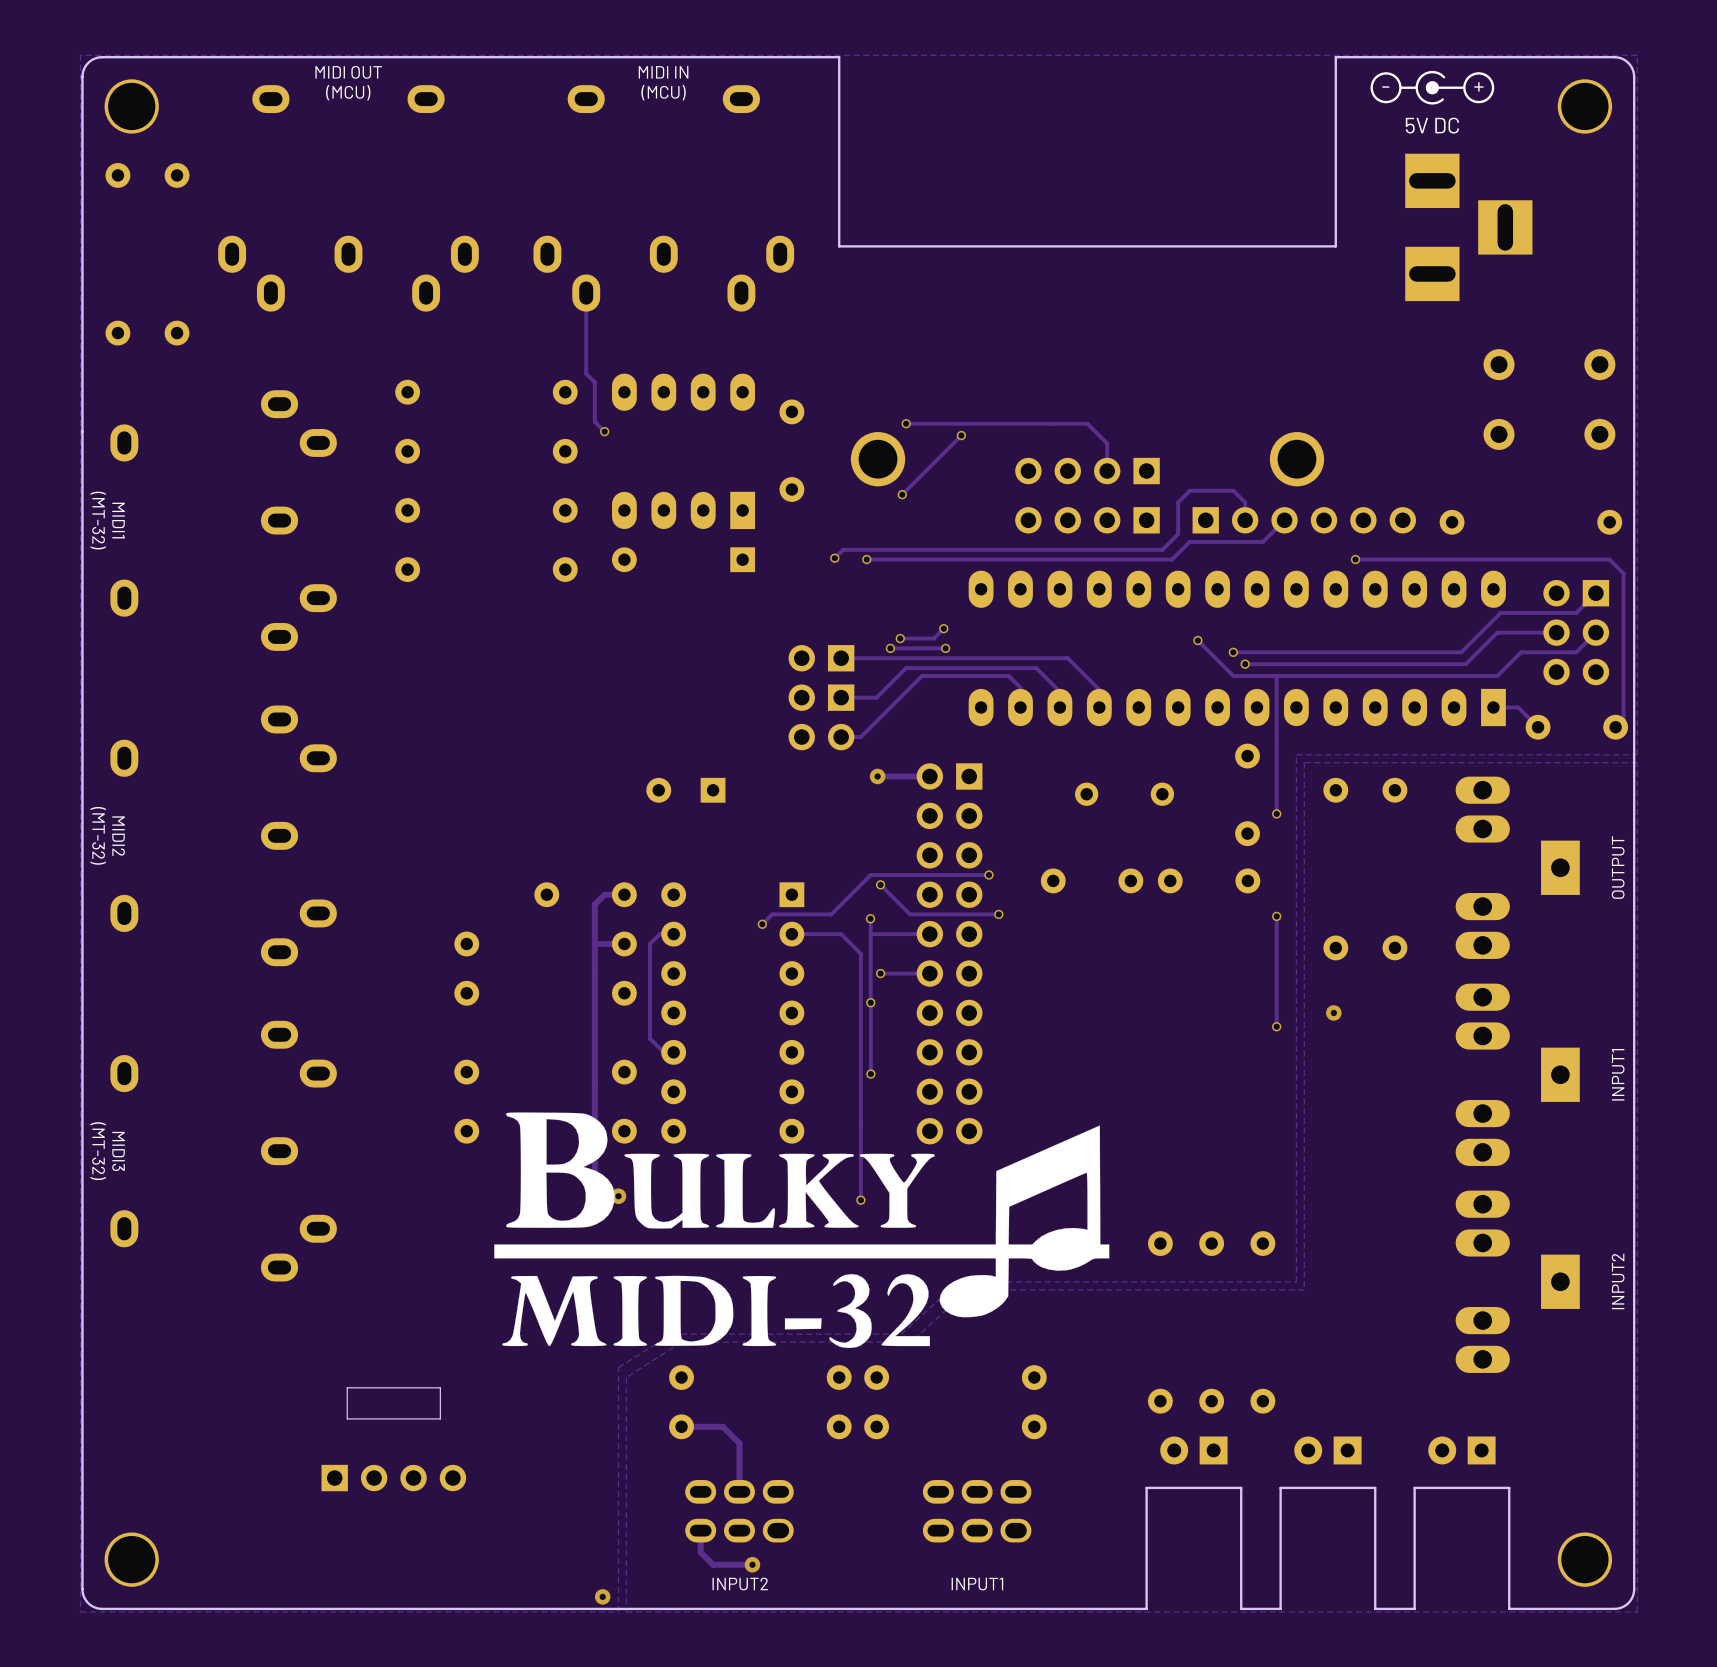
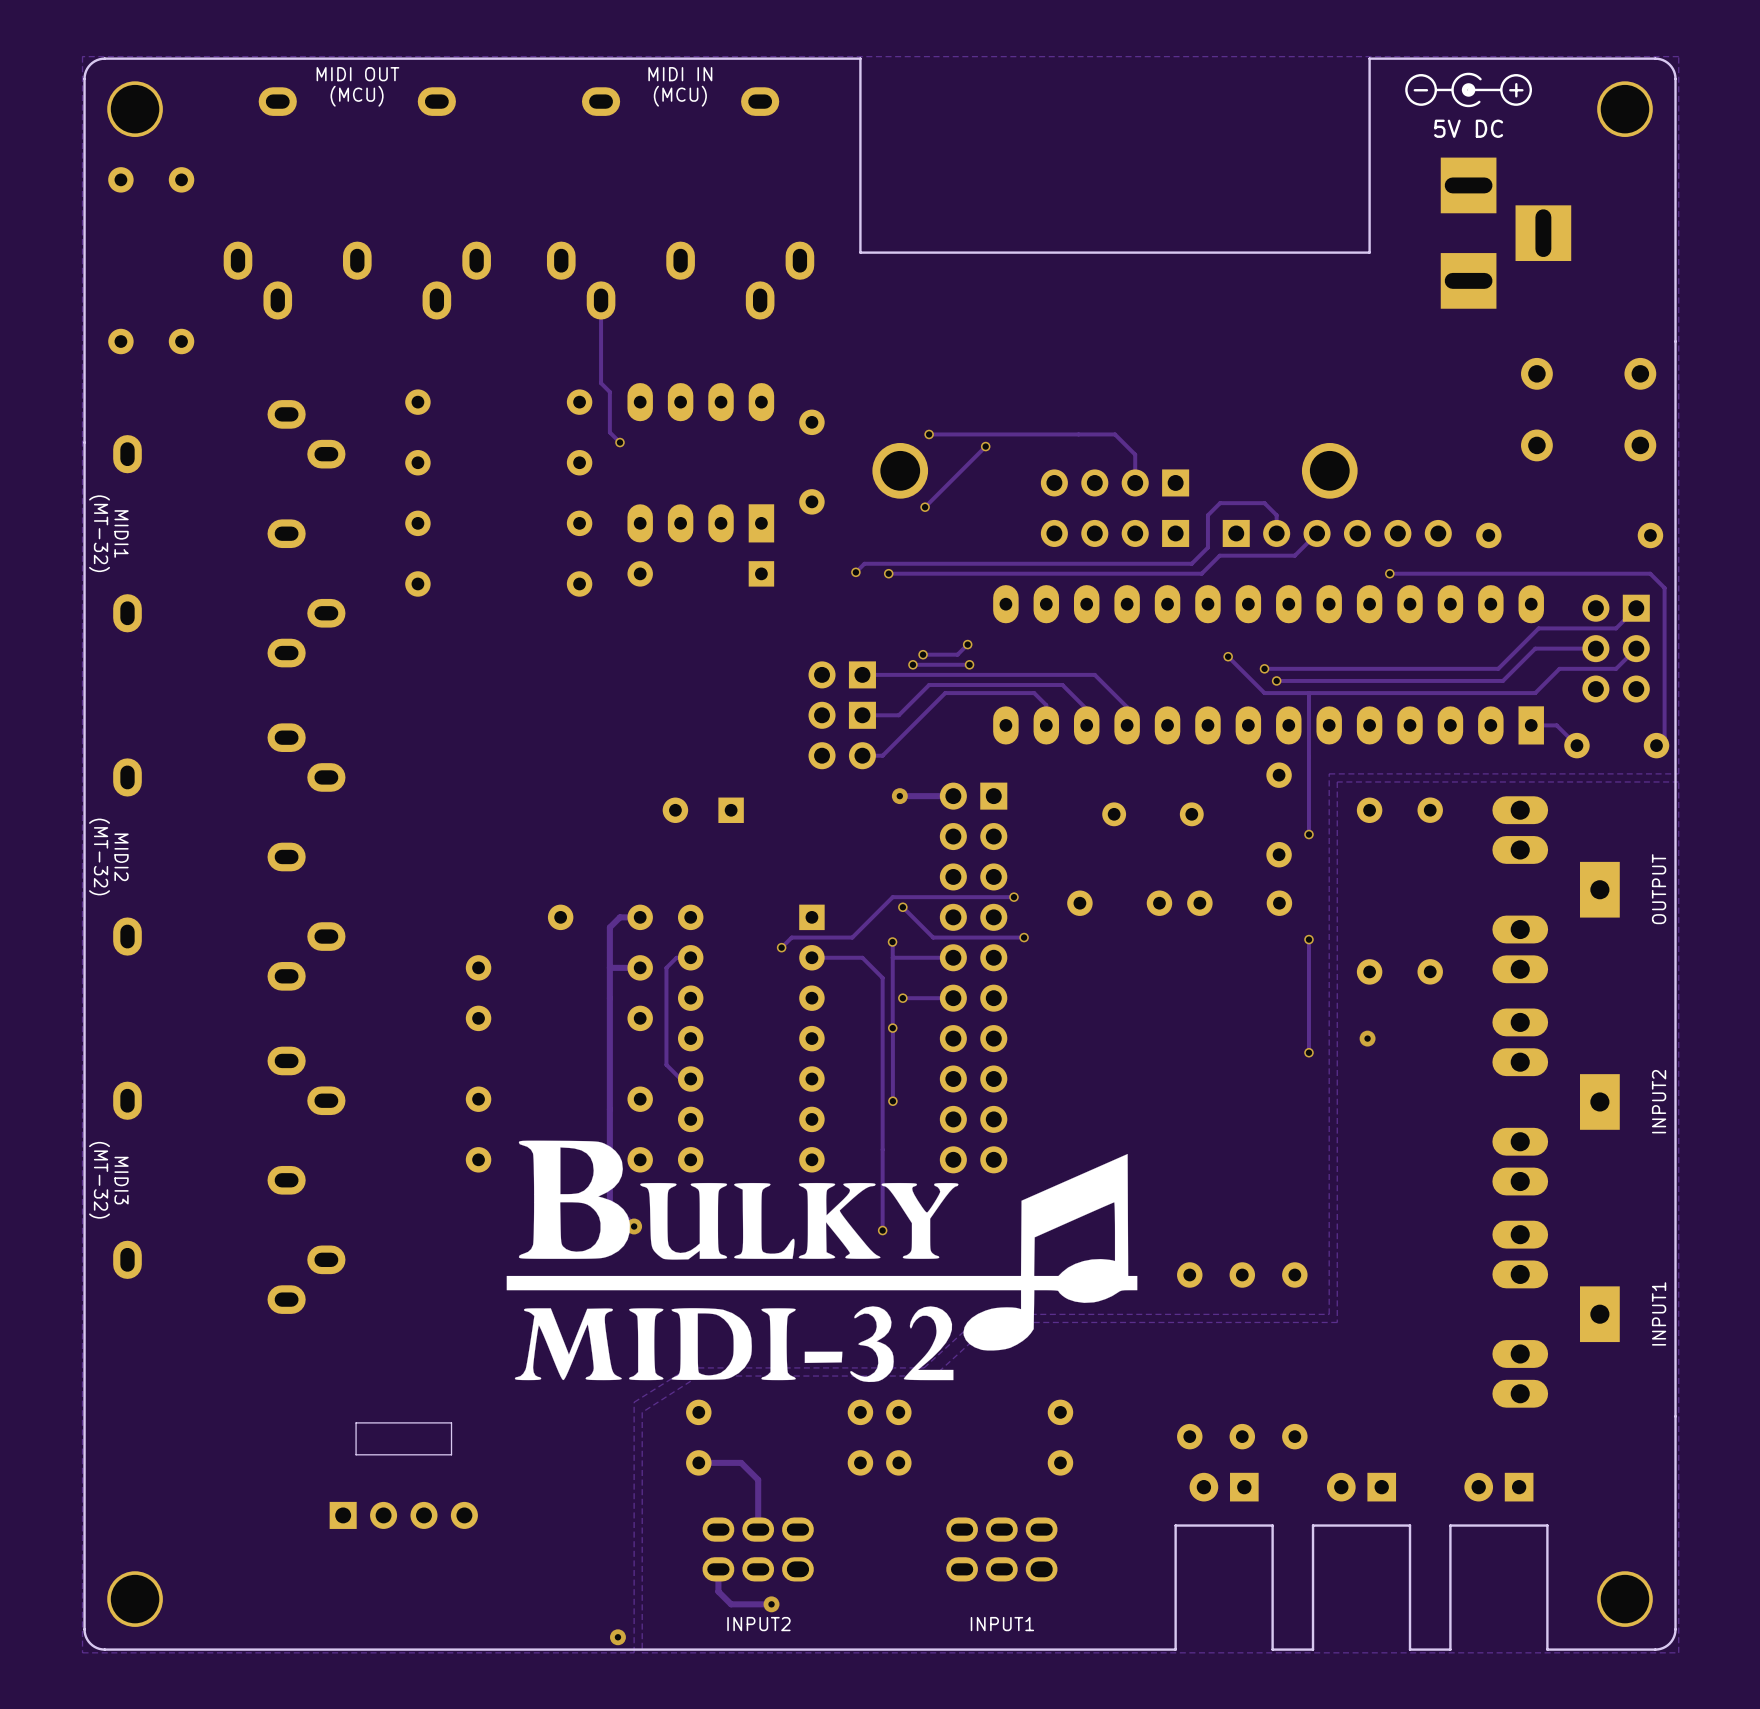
text: INPUT1 (1618, 1074) -> INPUT2 (1659, 1101)
text: INPUT2 (1618, 1281) -> INPUT1 (1659, 1313)

